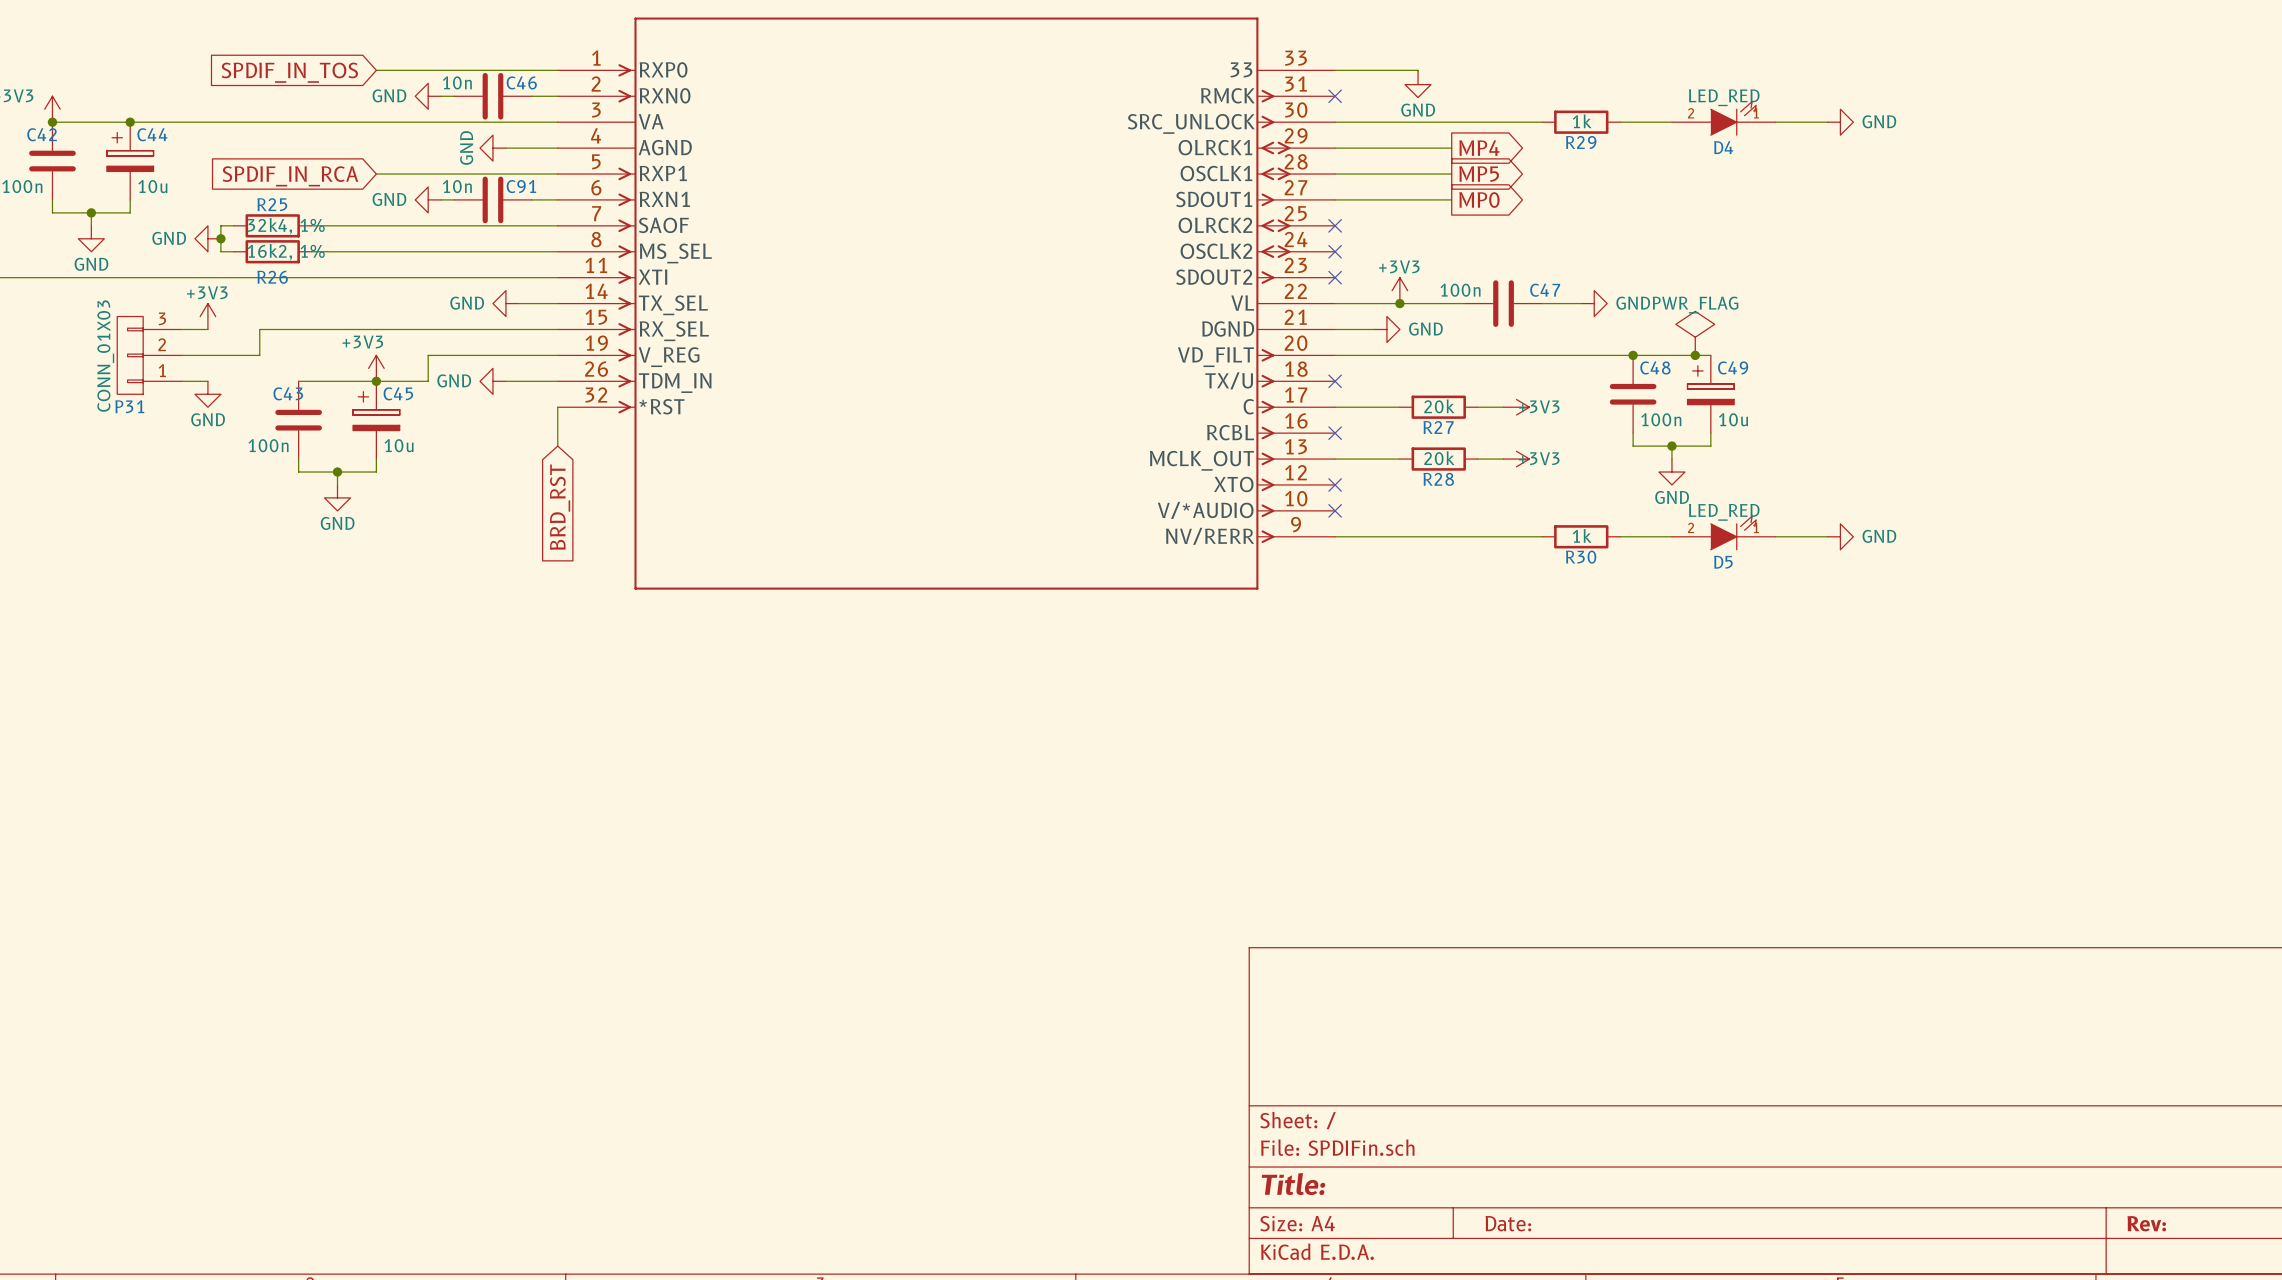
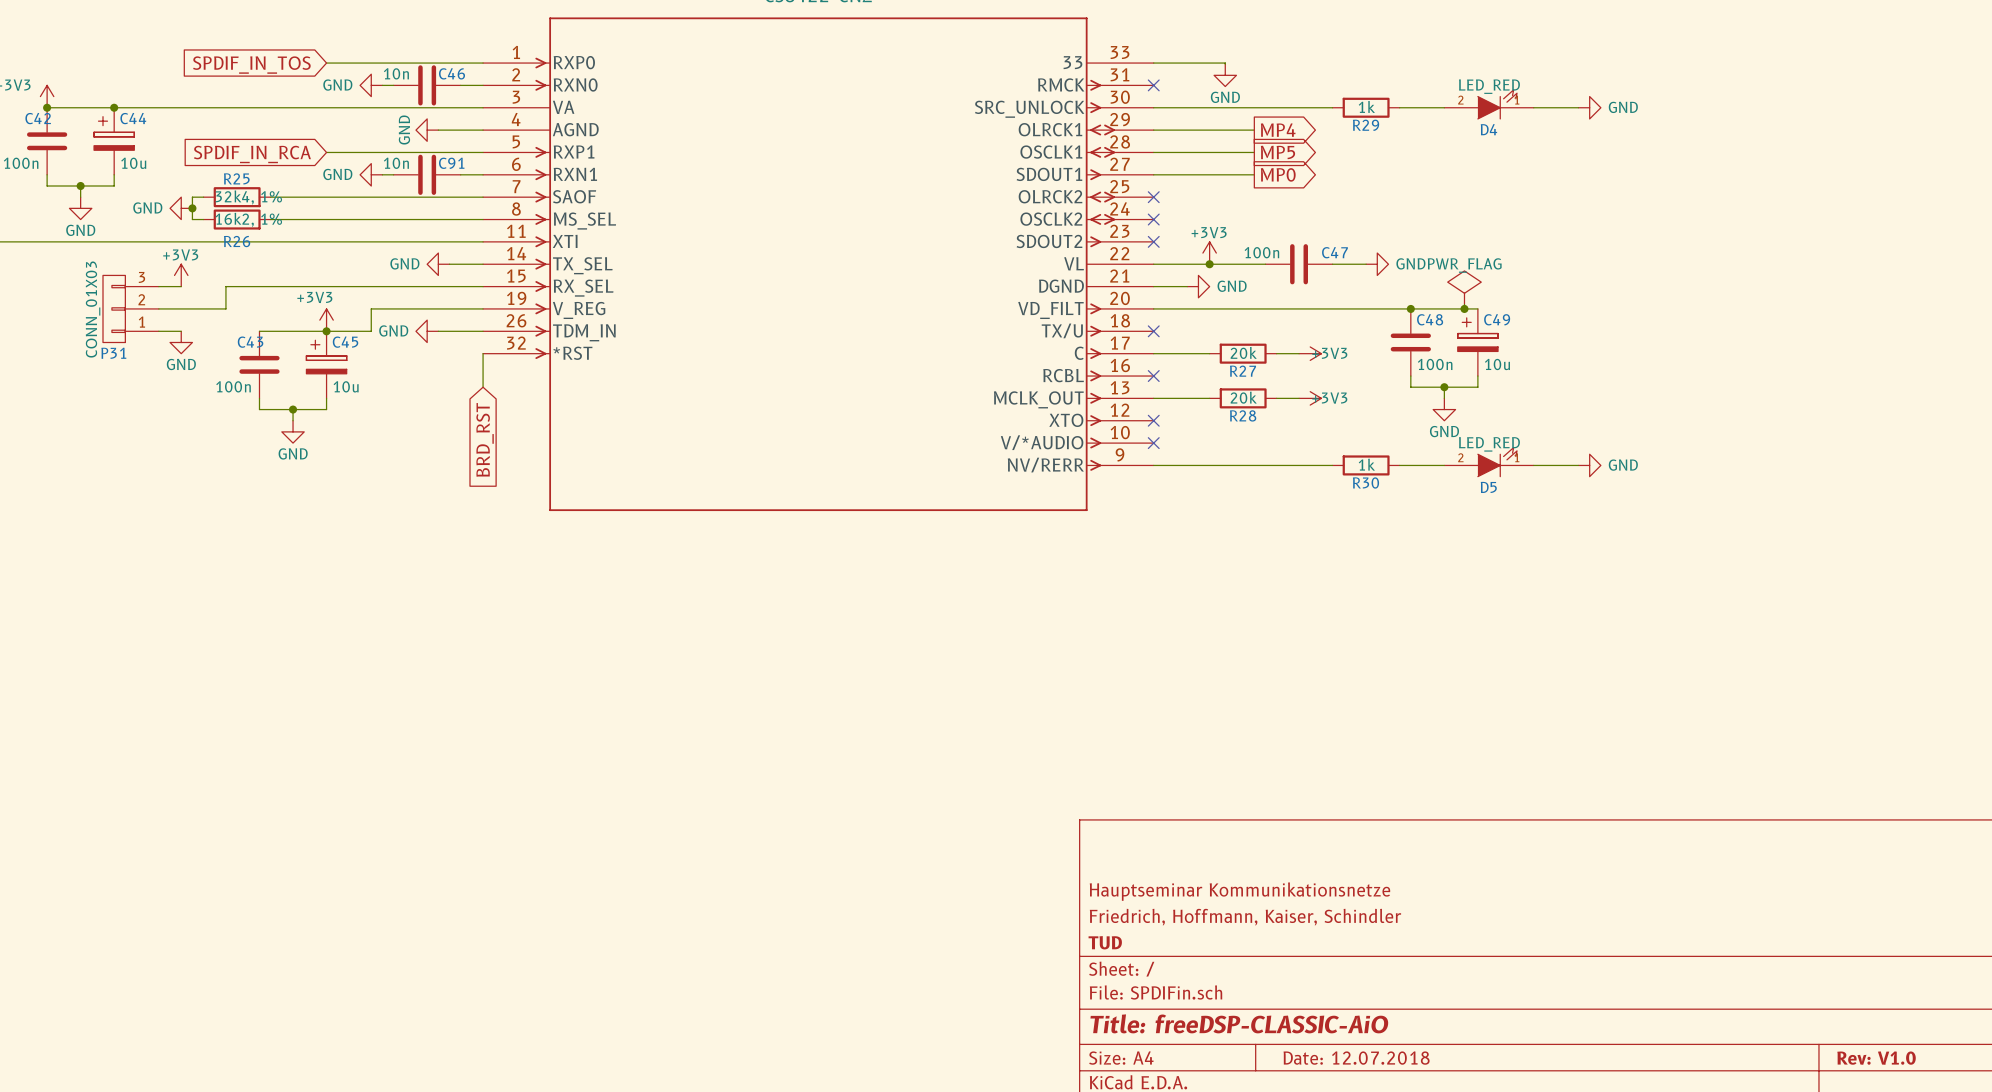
title block: none -> Hauptseminar Kommunikationsnetze (1239, 891)
title block: none -> Friedrich, Hoffmann, Kaiser, Schindler (1245, 917)
title block: none -> TUD (1105, 942)
title block: Title: (1293, 1184) -> Title: freeDSP-CLASSIC-AiO (1239, 1023)
title block: Date: (1508, 1223) -> Date: 12.07.2018 (1356, 1058)
title block: Rev: (2146, 1223) -> Rev: V1.0 (1876, 1058)

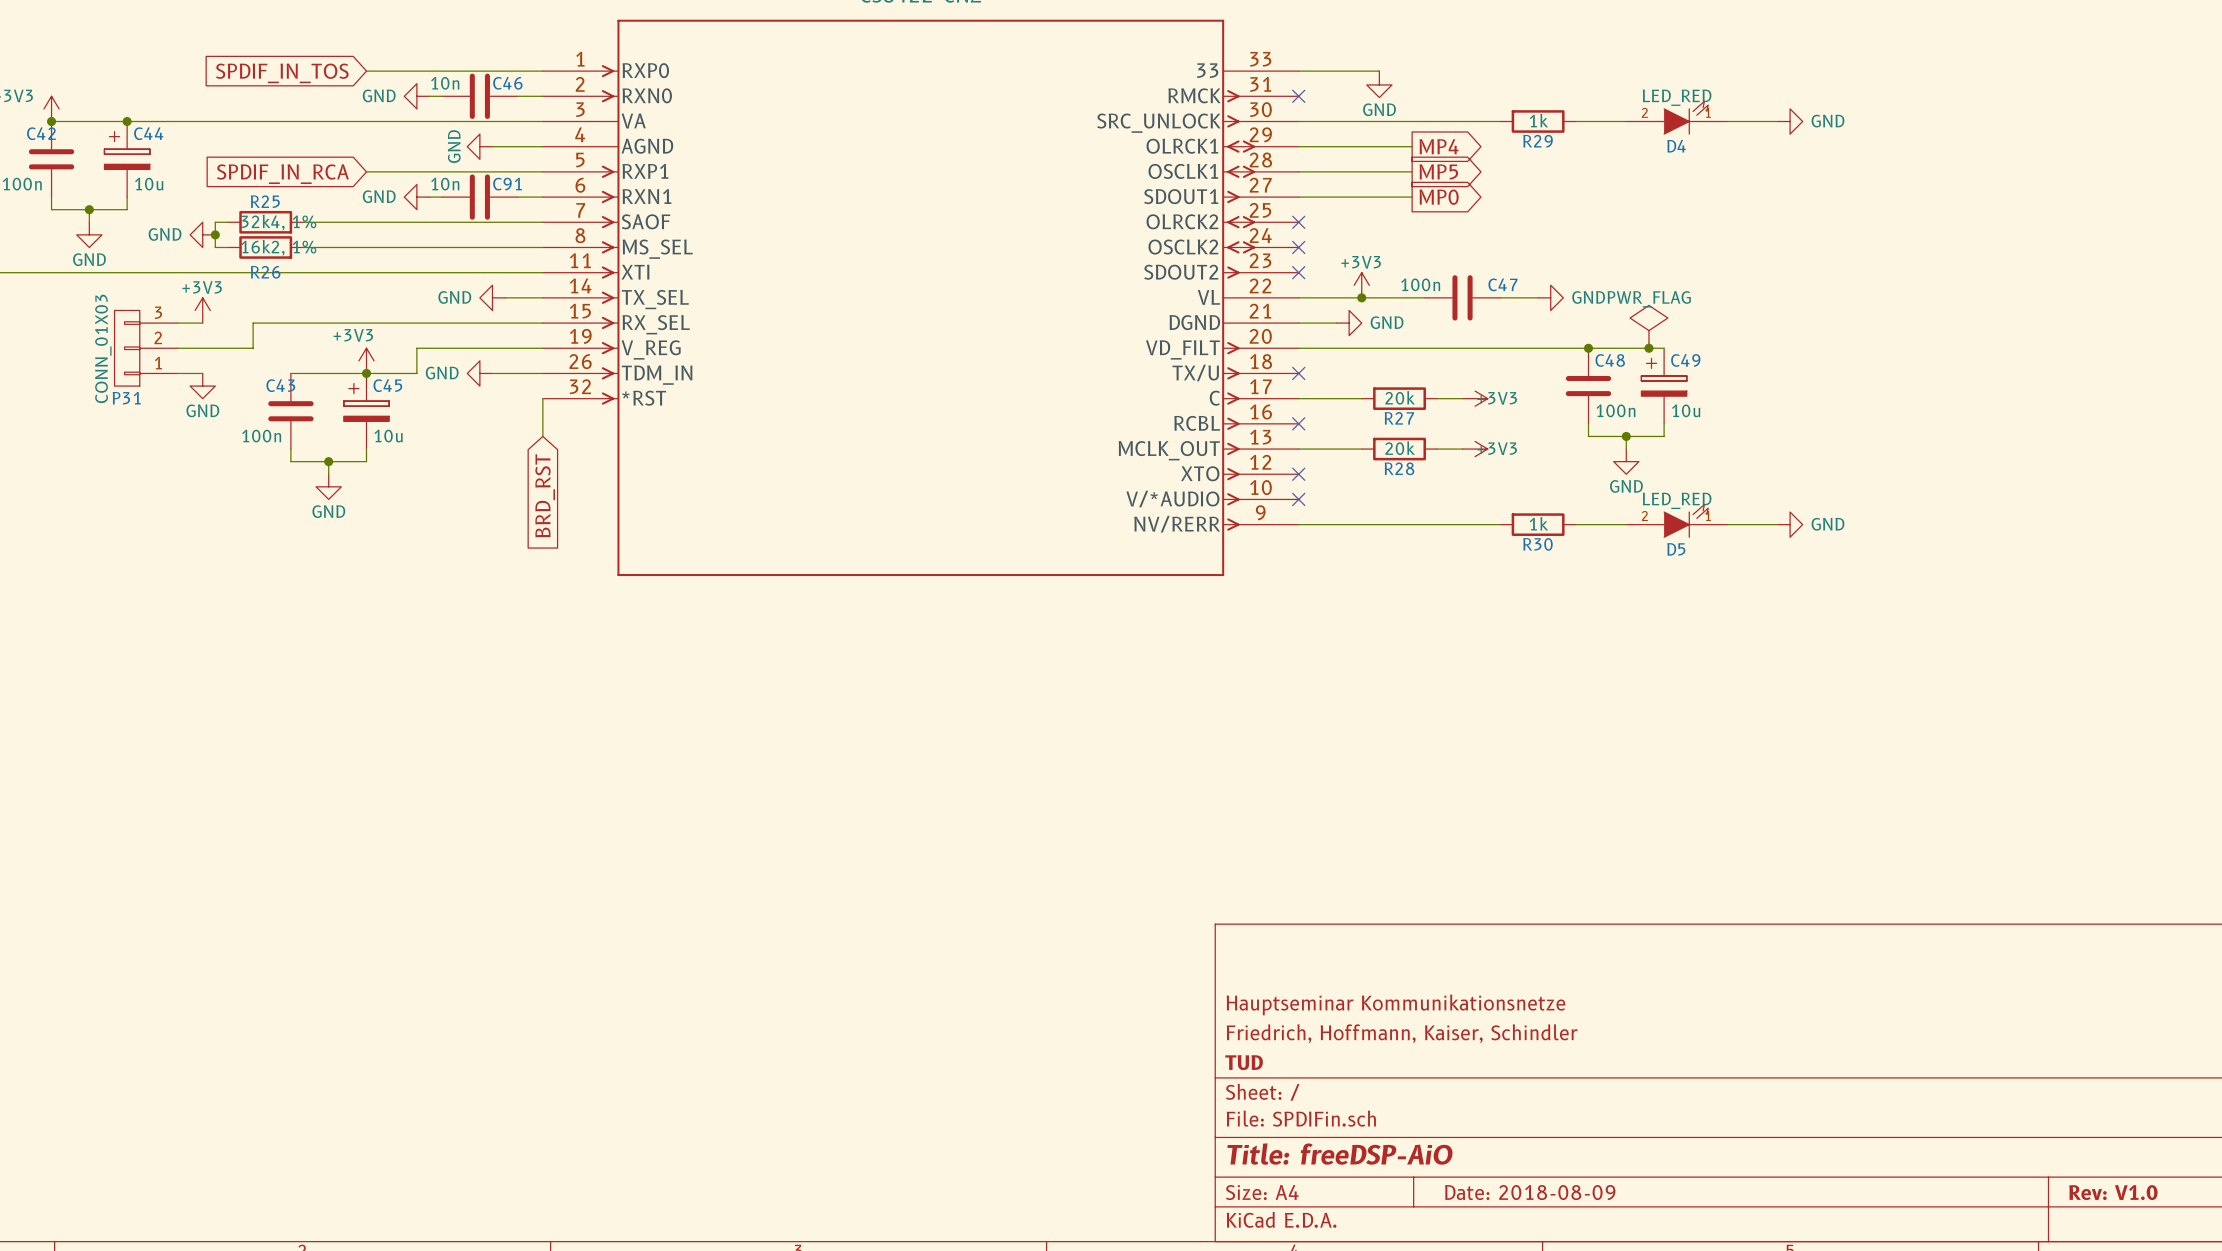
title block: Title: freeDSP-CLASSIC-AiO (1239, 1023) -> Title: freeDSP-AiO (1340, 1153)
title block: Date: 12.07.2018 (1356, 1058) -> Date: 2018-08-09 (1530, 1192)

